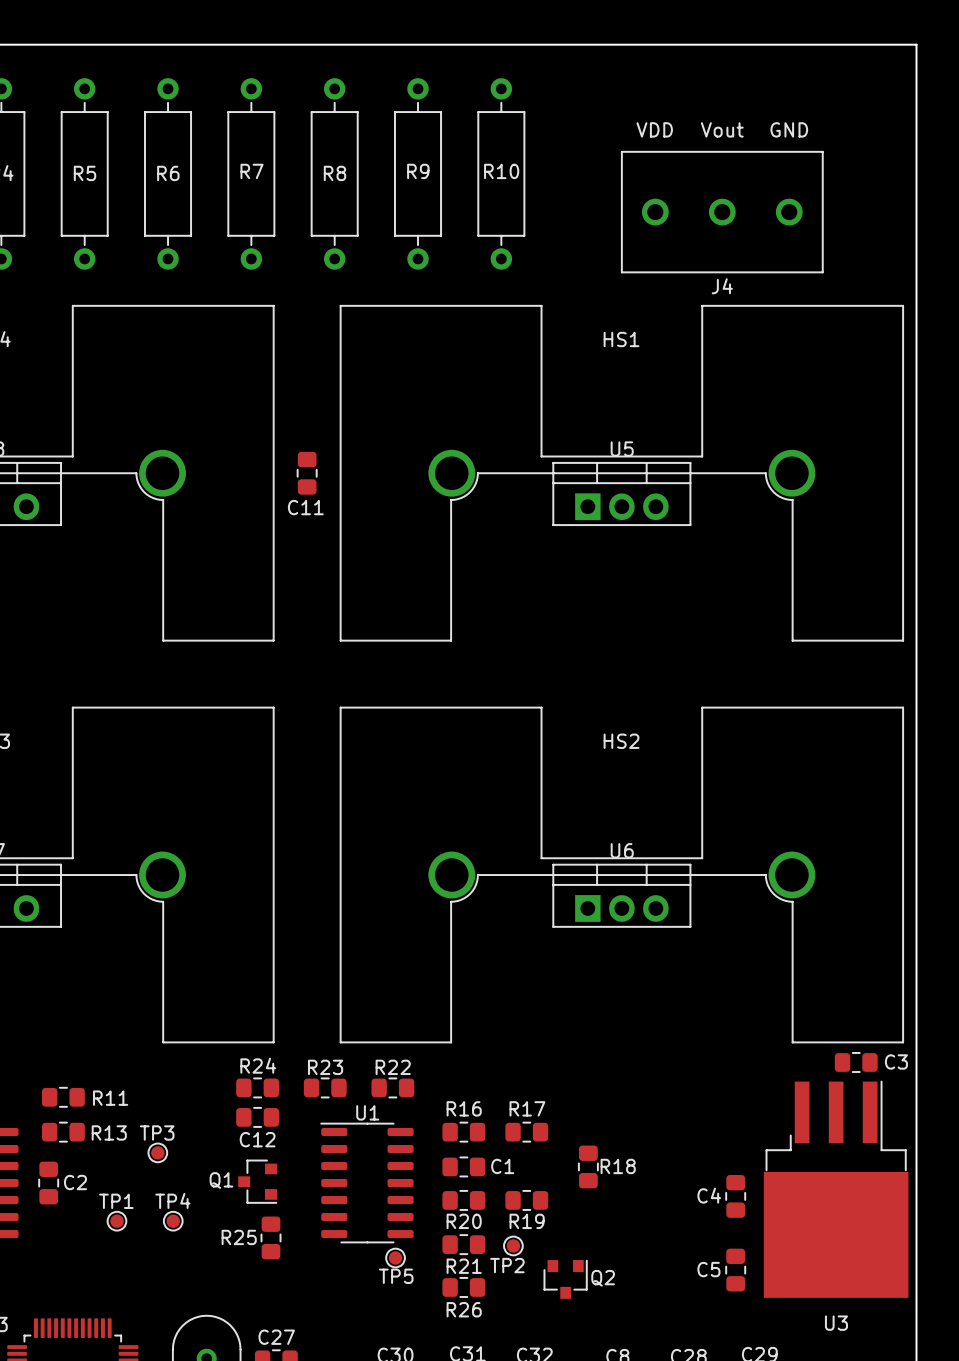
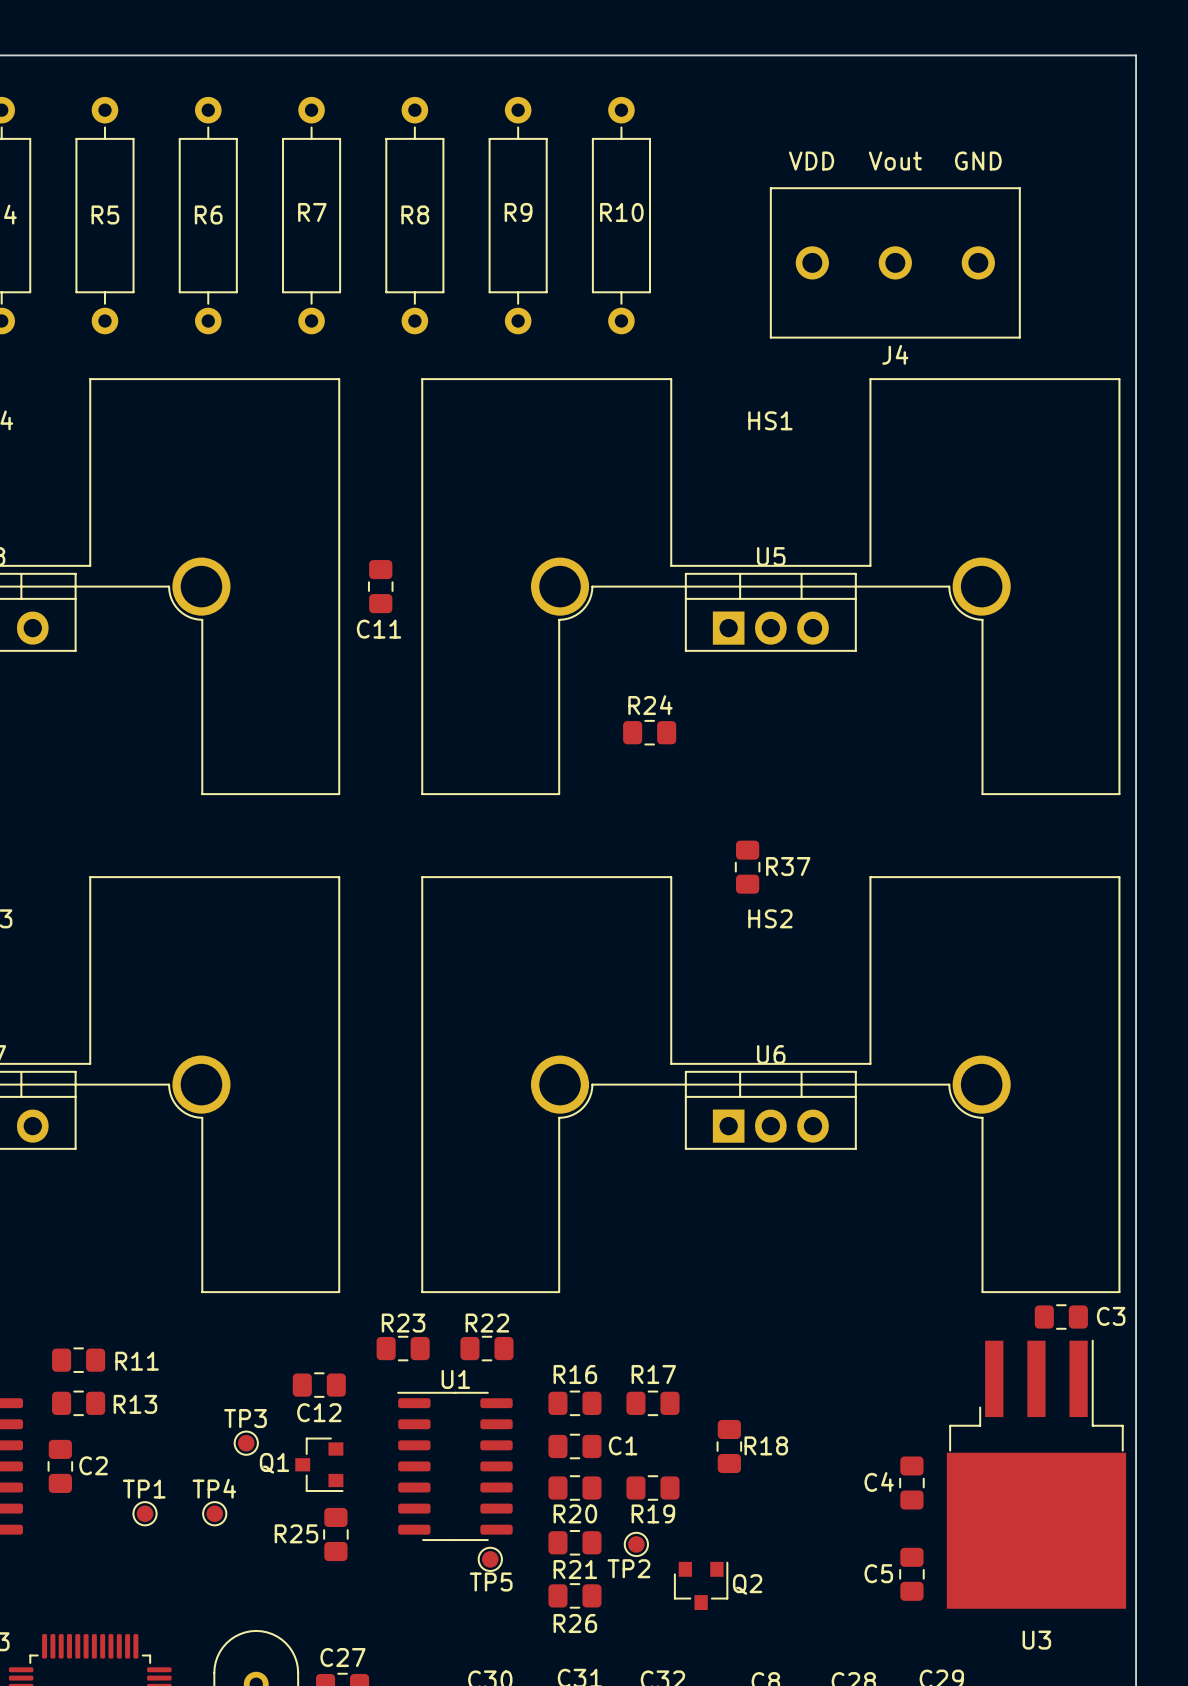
R37: none -> (747, 867)
R24 position: (257, 1087) -> (649, 732)
TP3 position: (157, 1152) -> (246, 1443)

